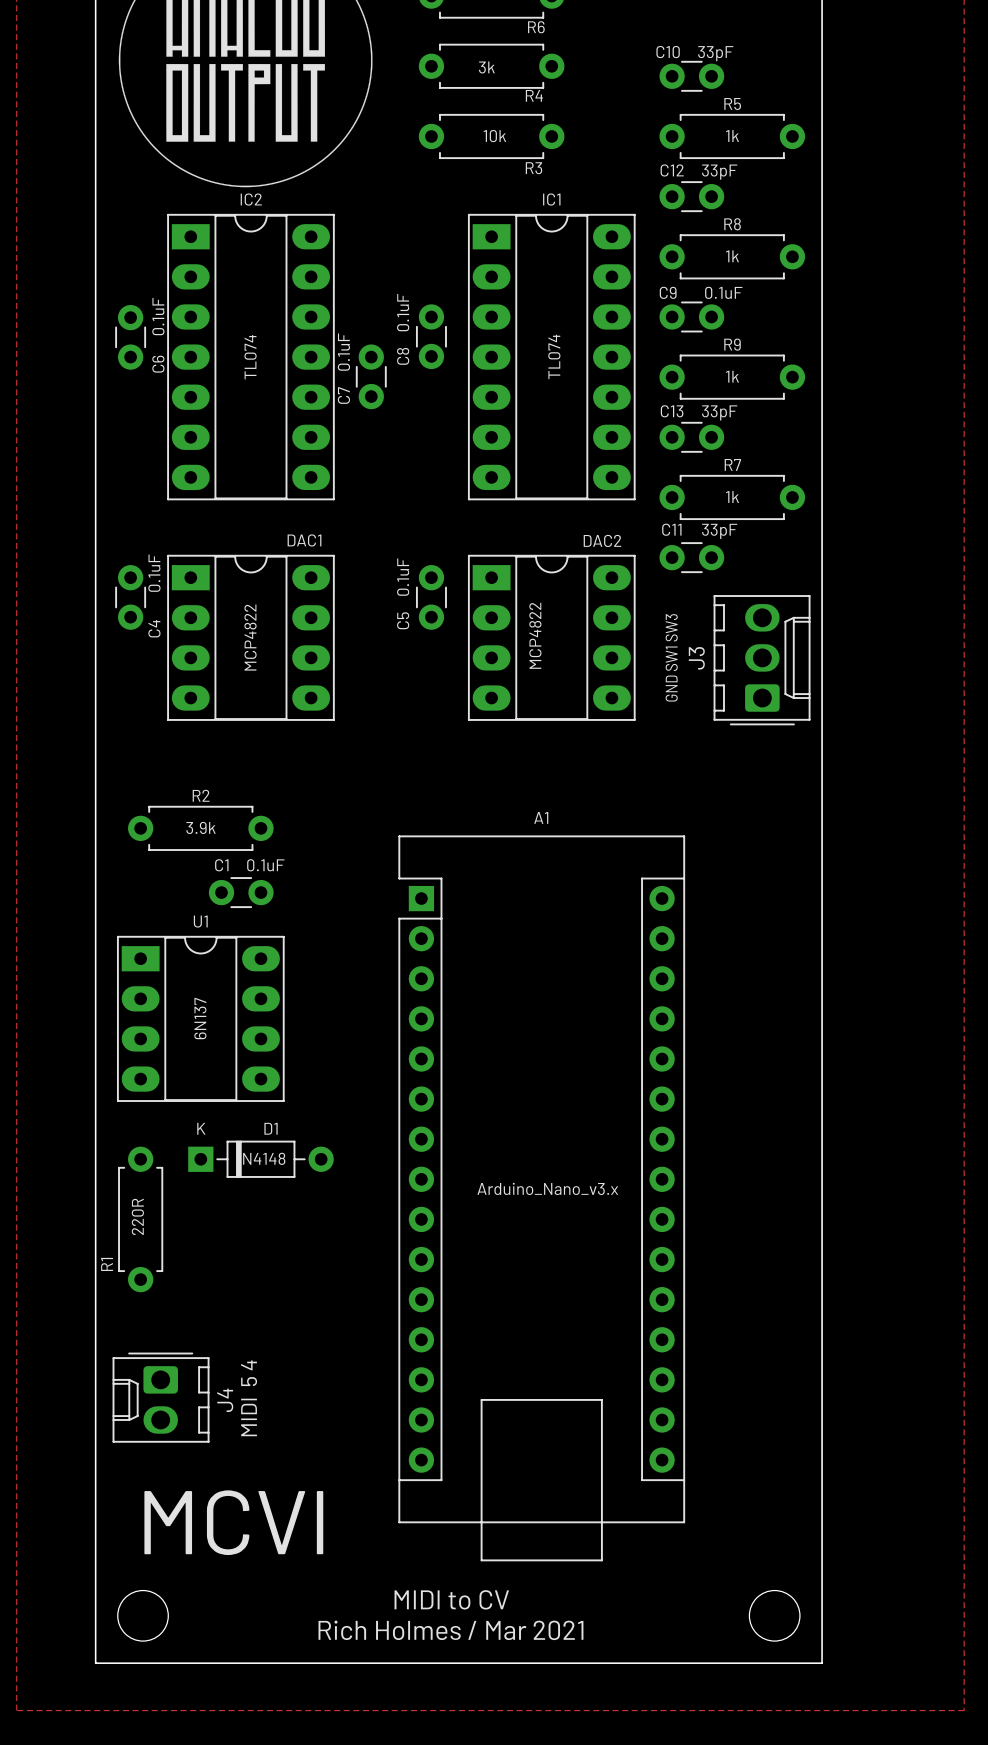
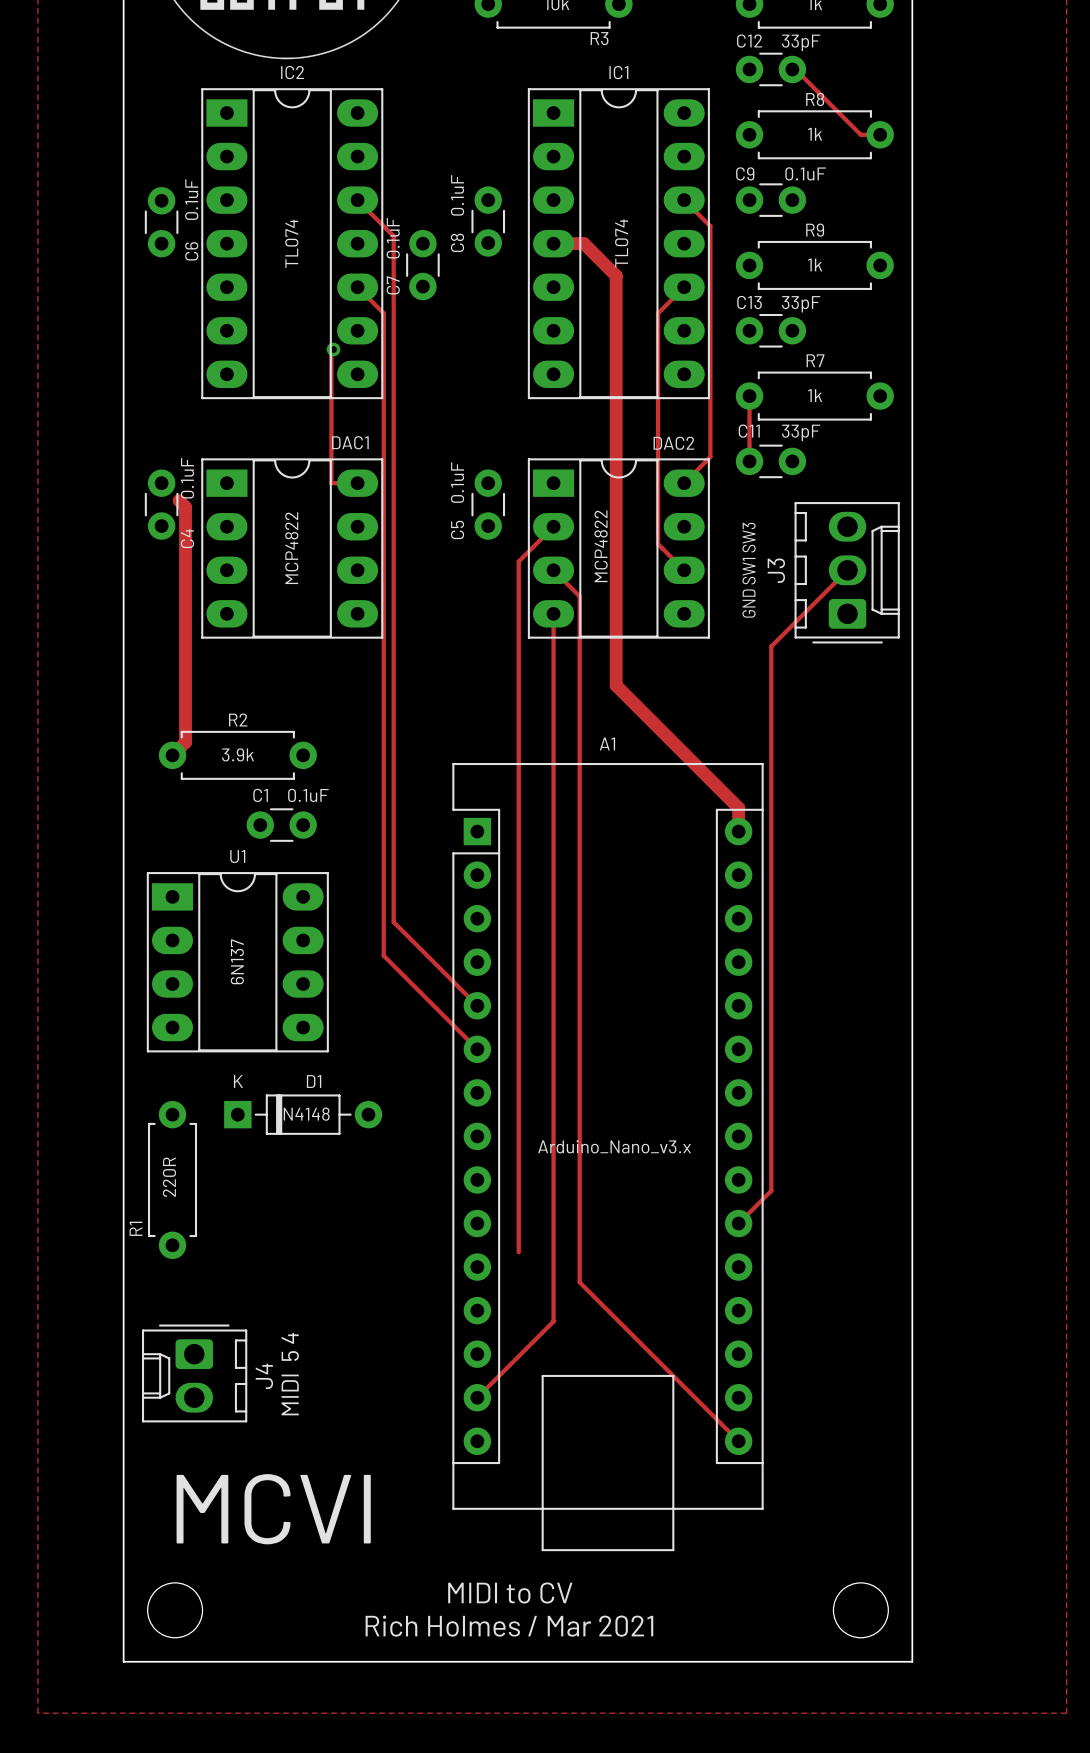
track: none -> (792, 69) (795, 69) (860, 134) (880, 134)
track: none -> (357, 200) (393, 236) (393, 922) (477, 1005)
track: none -> (684, 200) (710, 226) (710, 457) (684, 483)
track: none -> (553, 243) (584, 243) (616, 275) (616, 685) (738, 807) (738, 831)
track: none -> (357, 287) (383, 313) (383, 955) (477, 1049)
track: none -> (684, 287) (658, 313) (658, 544) (684, 570)
track: none -> (333, 349) (331, 351) (331, 483) (357, 483)
via: none -> (333, 349)
track: none -> (749, 396) (749, 461)
track: none -> (179, 500) (185, 507) (185, 742) (172, 755)
track: none -> (553, 526) (518, 561) (518, 1252)
track: none -> (553, 570) (579, 596) (579, 1282) (738, 1441)
track: none -> (847, 570) (771, 646) (771, 1190) (738, 1223)
track: none -> (553, 613) (553, 1321) (477, 1397)

